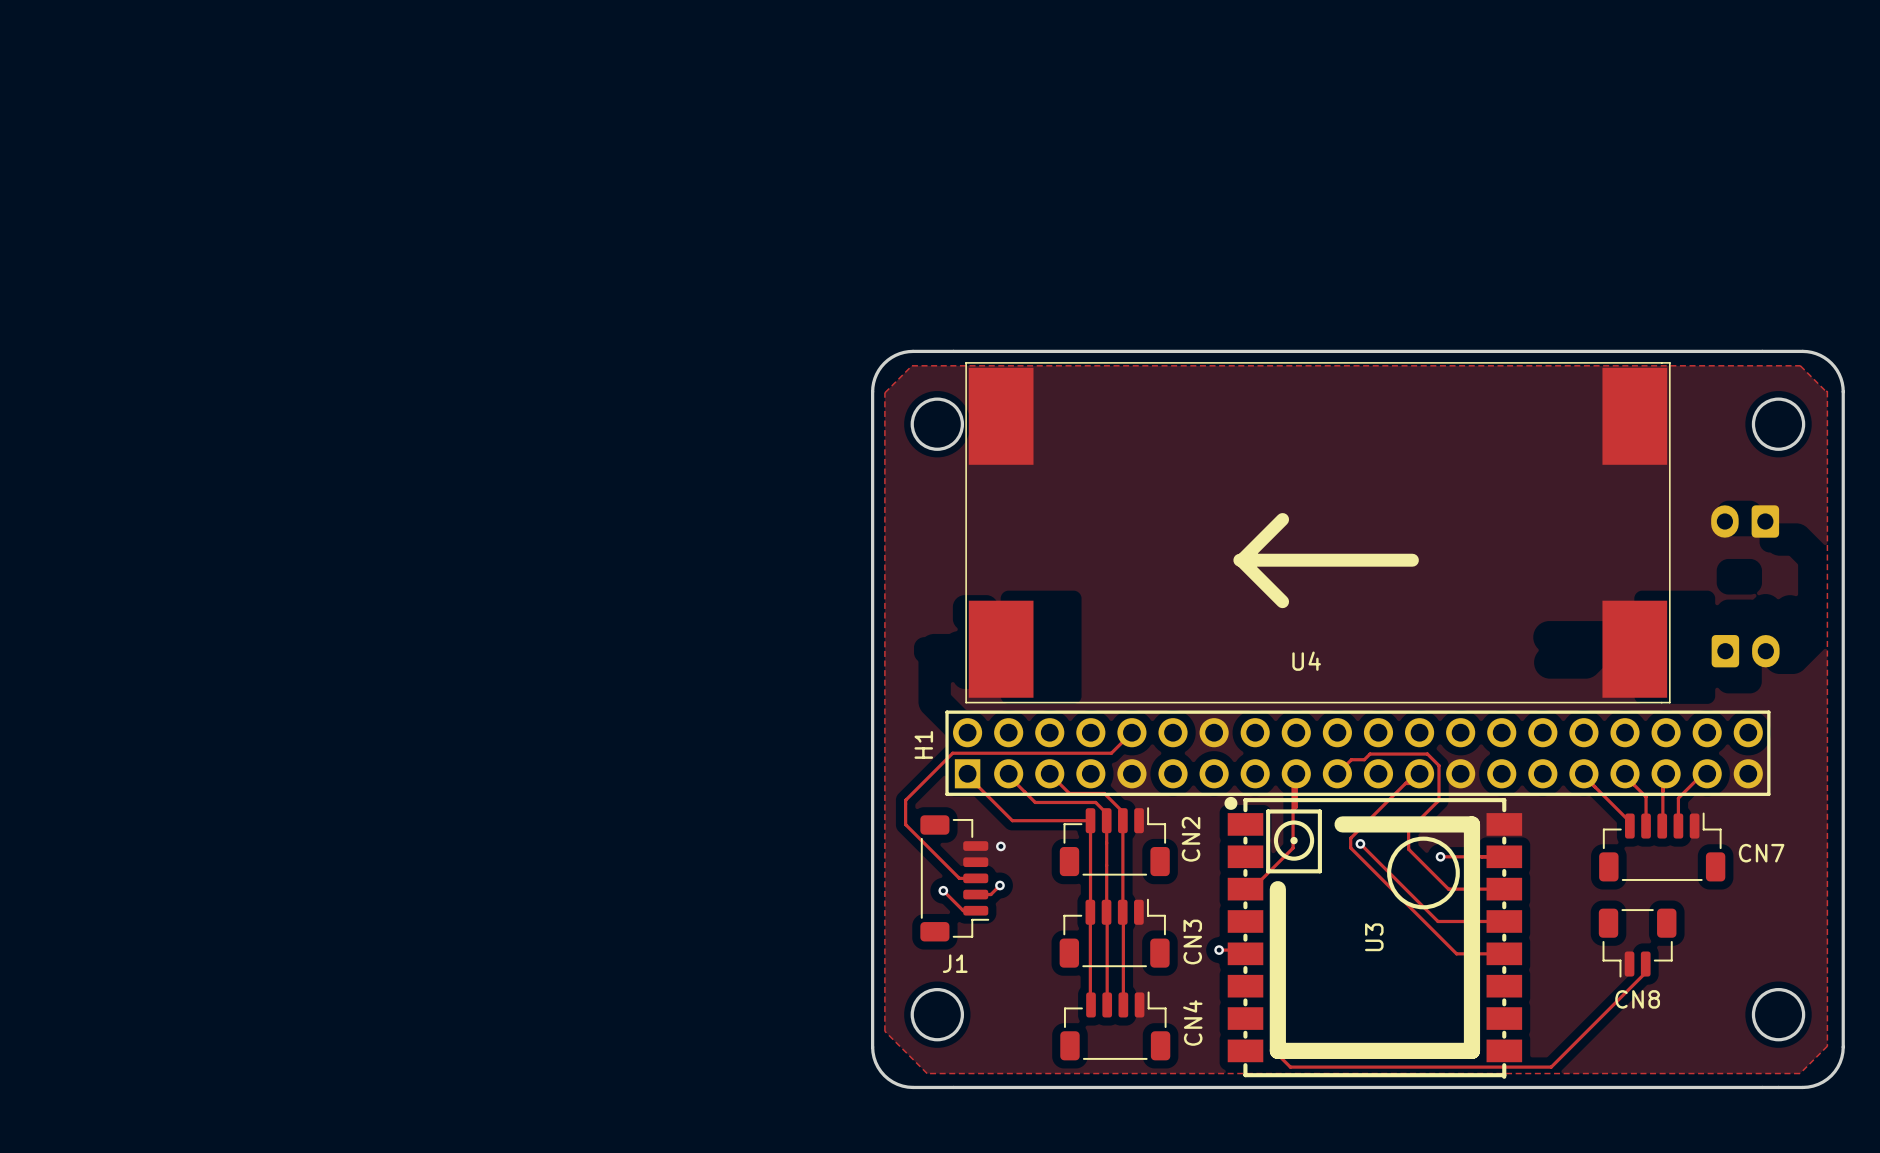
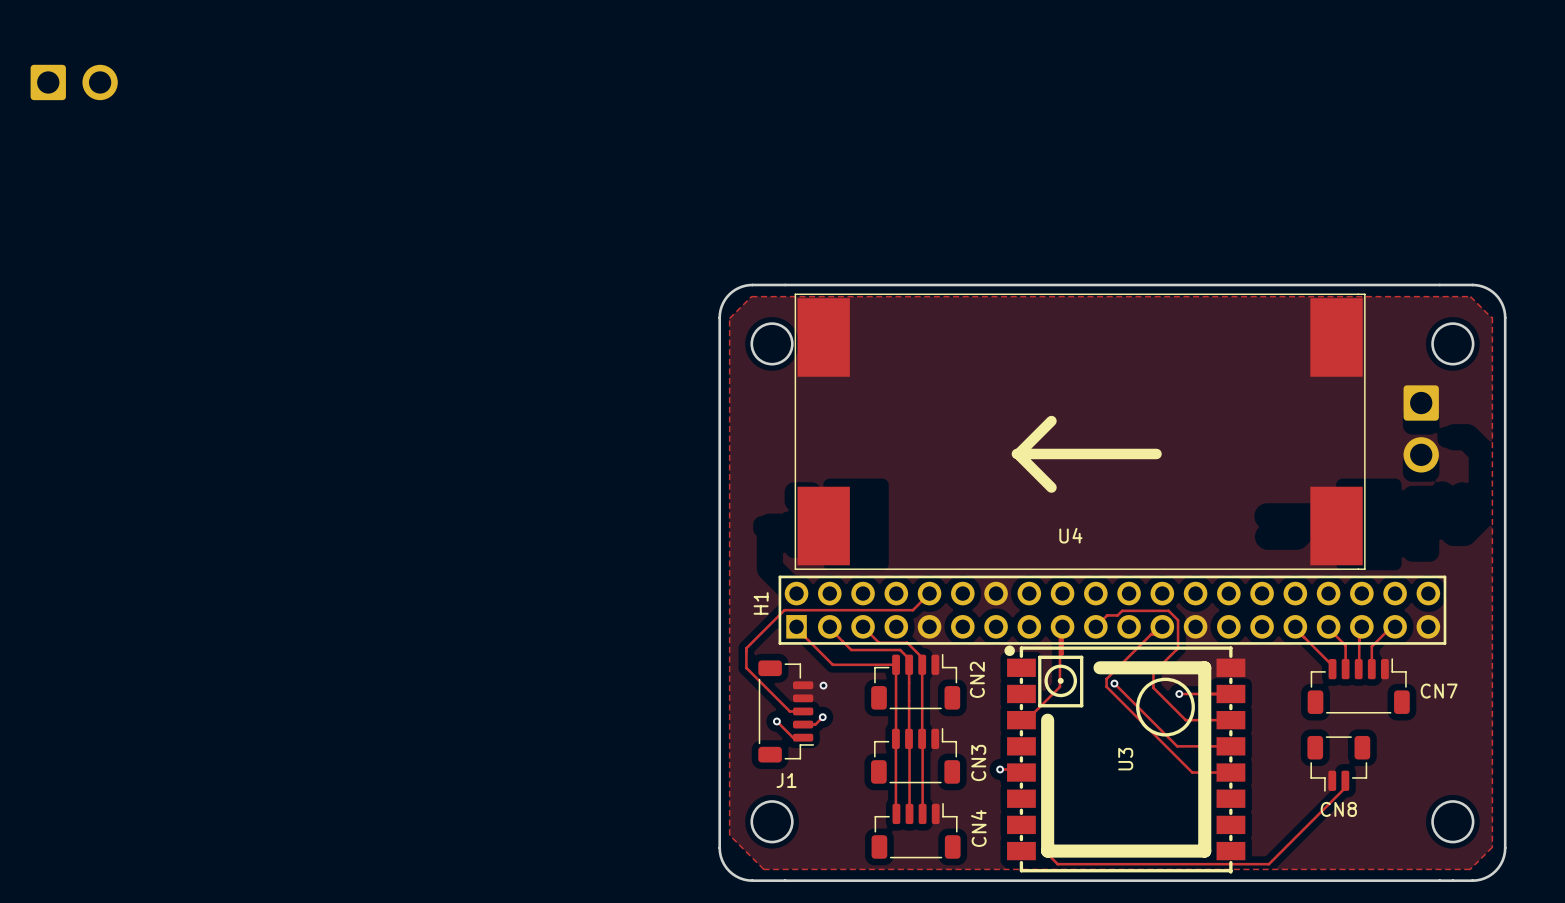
part: none -> (74, 82)
part footprint: [1711, 505, 1780, 538] -> [1403, 385, 1439, 473]
part: (1745, 651) -> none

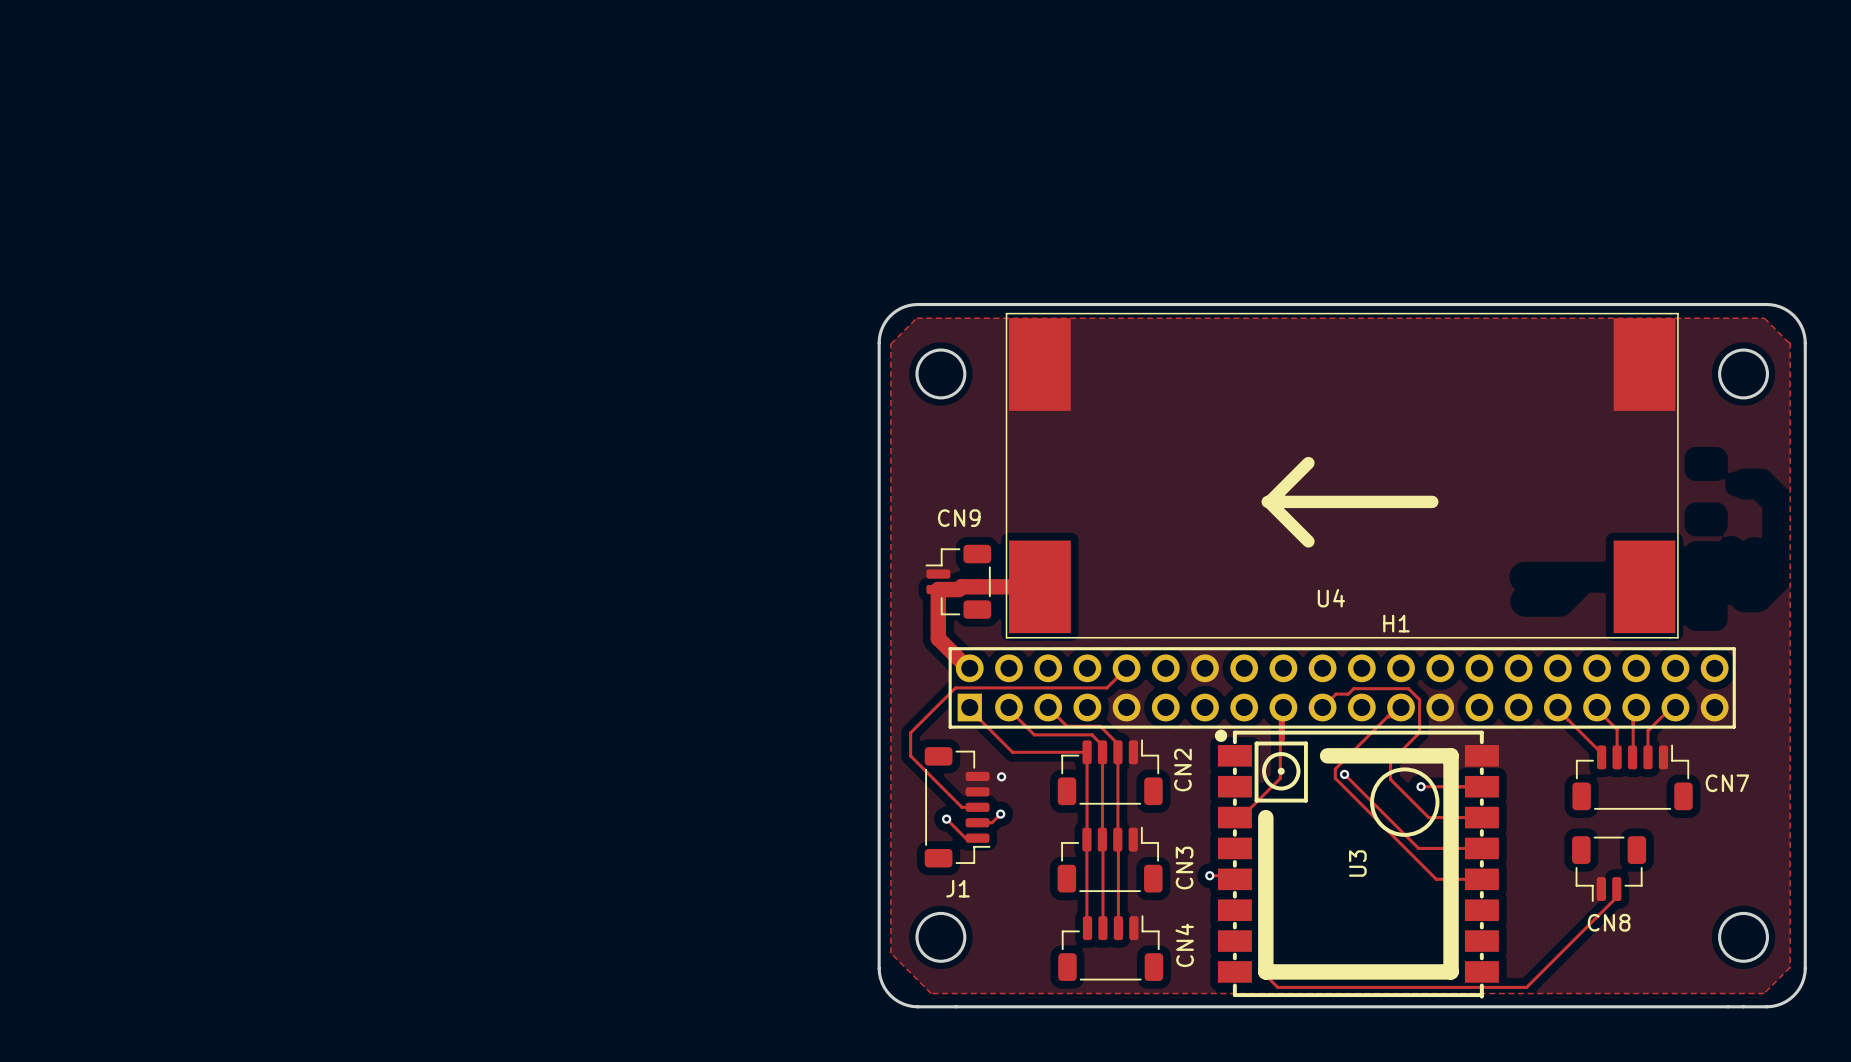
part: (74, 82) -> none
part: (1421, 428) -> none
U4 position: (1080, 431) -> (1342, 475)
CN9: none -> (958, 581)
track: none -> (1039, 586) (961, 586) (958, 589) (938, 589)
track: none -> (938, 589) (938, 638) (968, 668)
H1 name rotation: 0° (761, 603) -> 90° clockwise (1396, 623)
H1 name position: H1 (761, 603) -> H1 (1396, 623)

